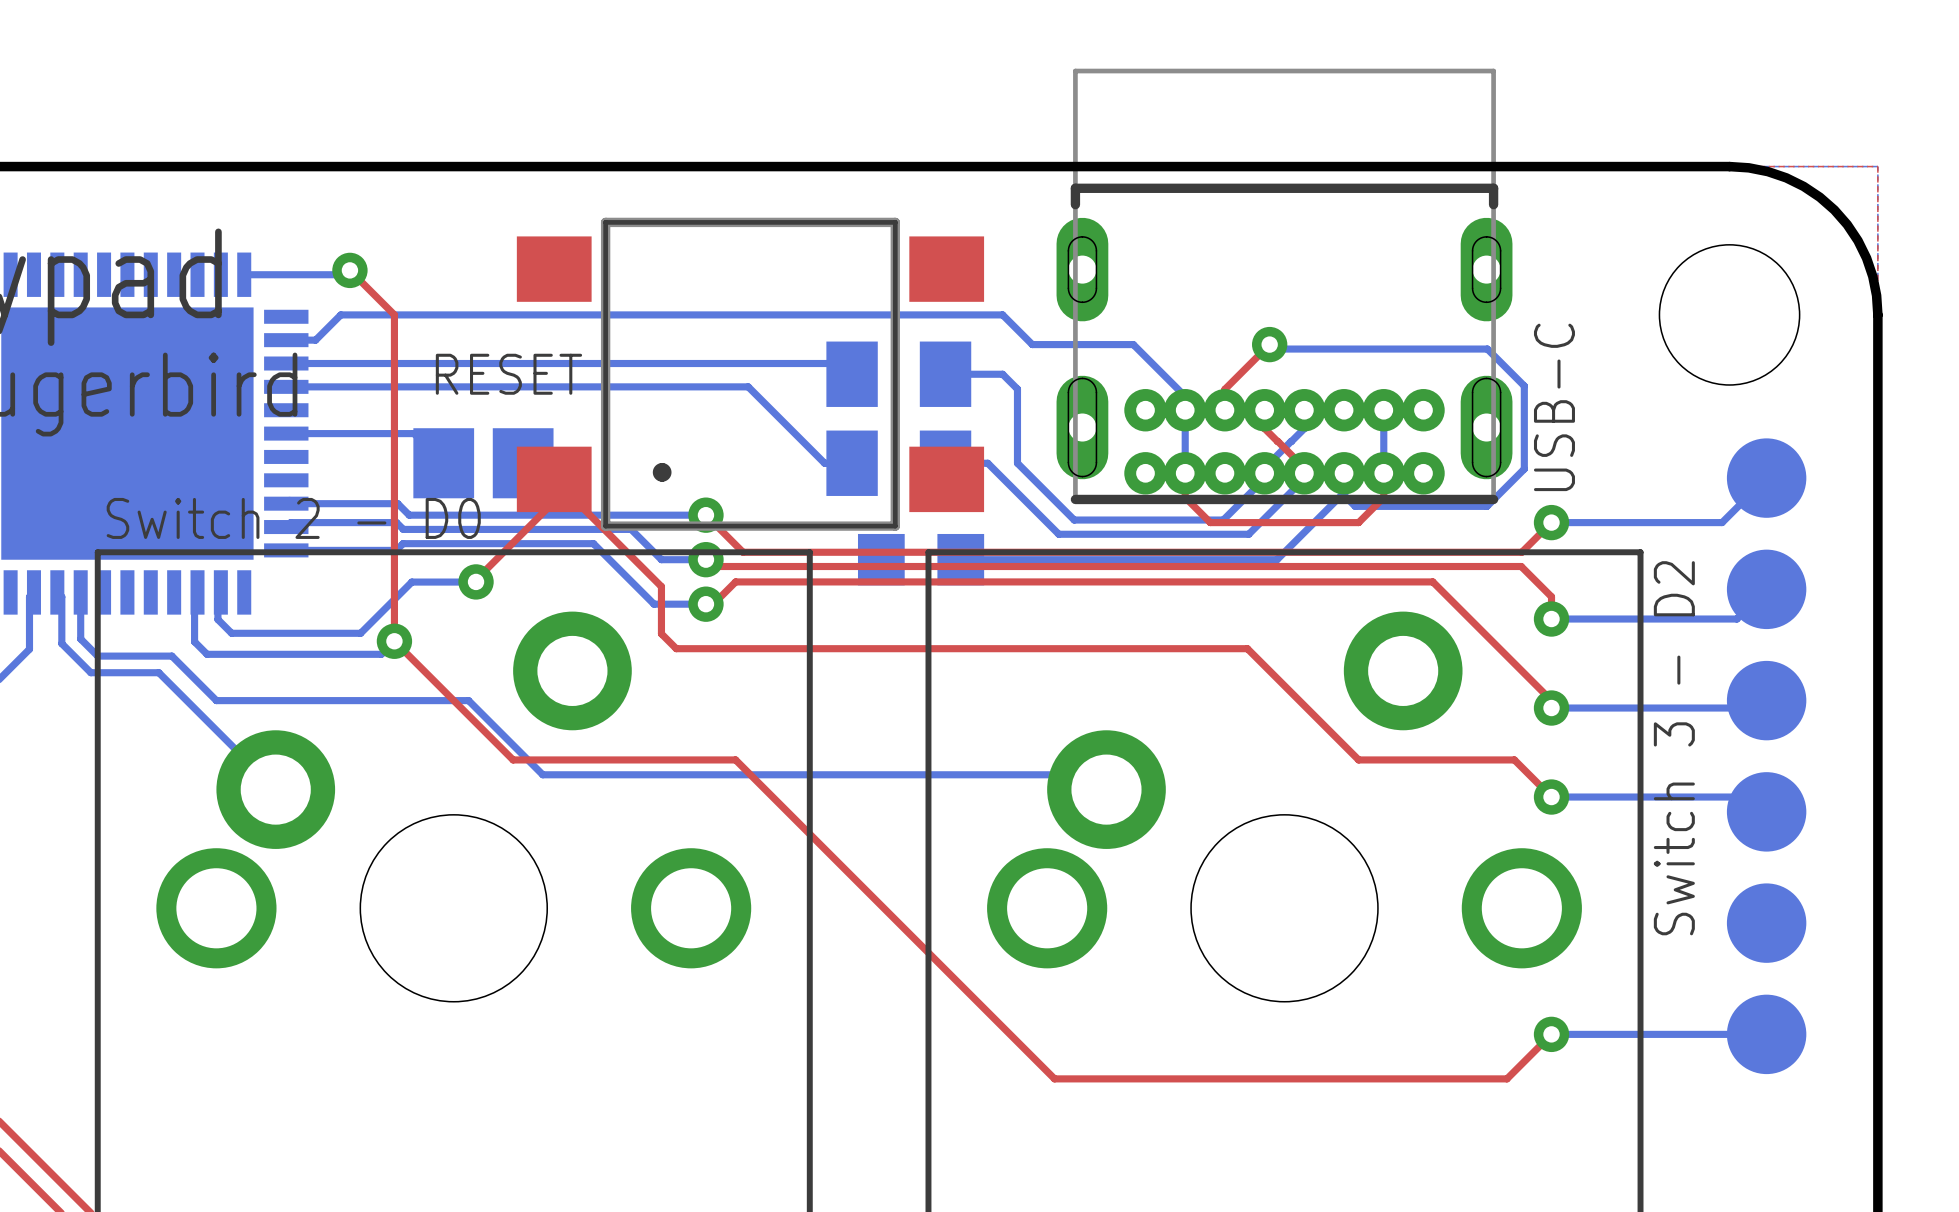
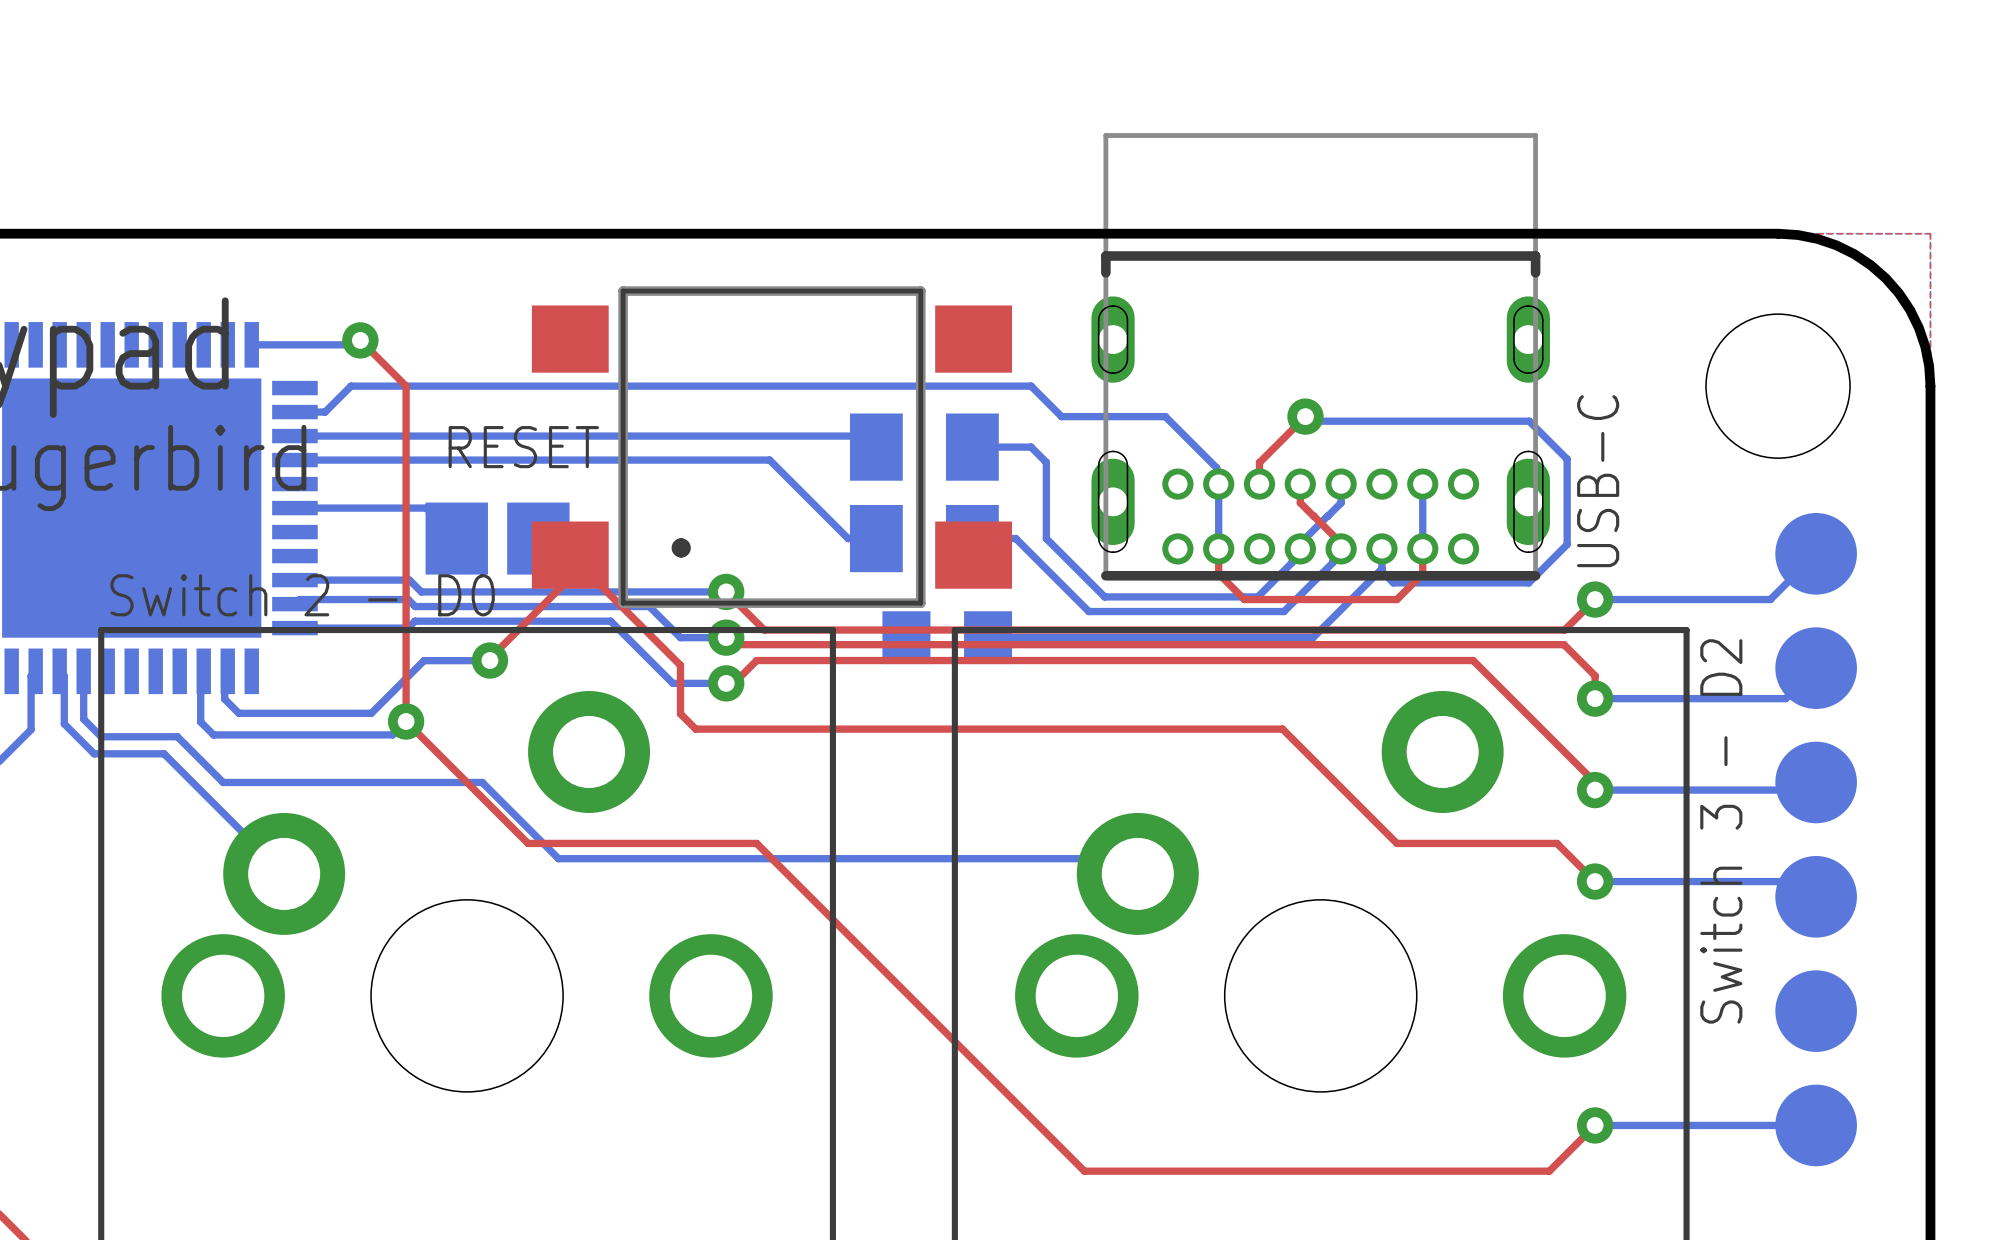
USB-C footprint: [1056, 68, 1513, 505] -> [1091, 133, 1550, 581]

